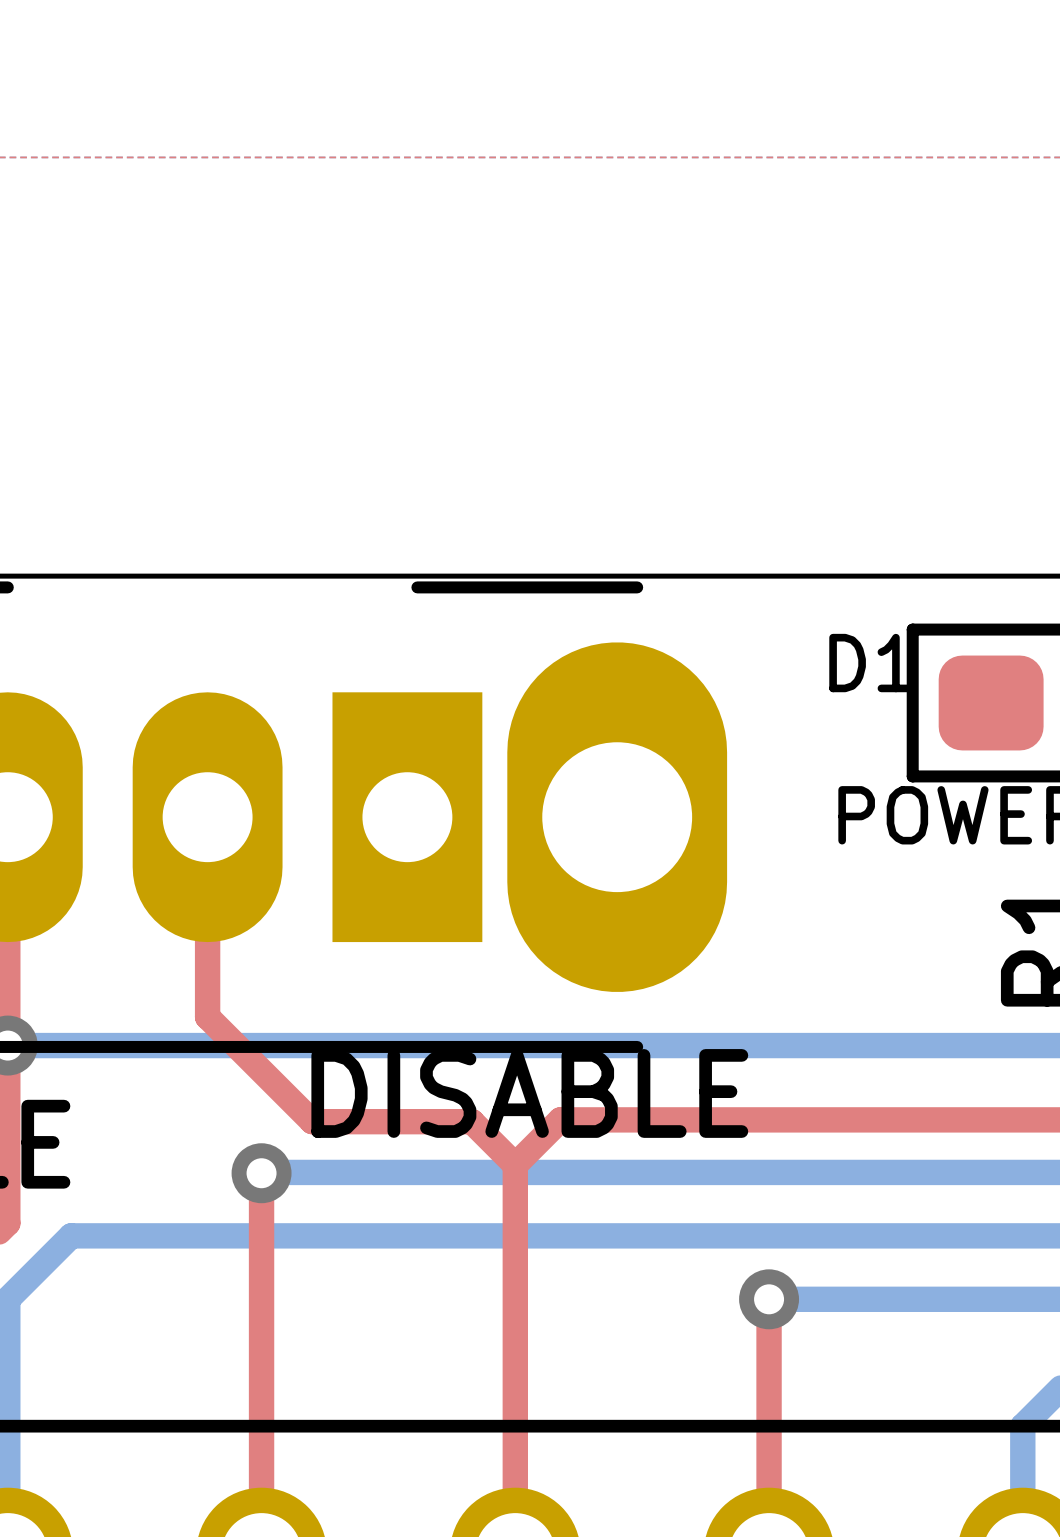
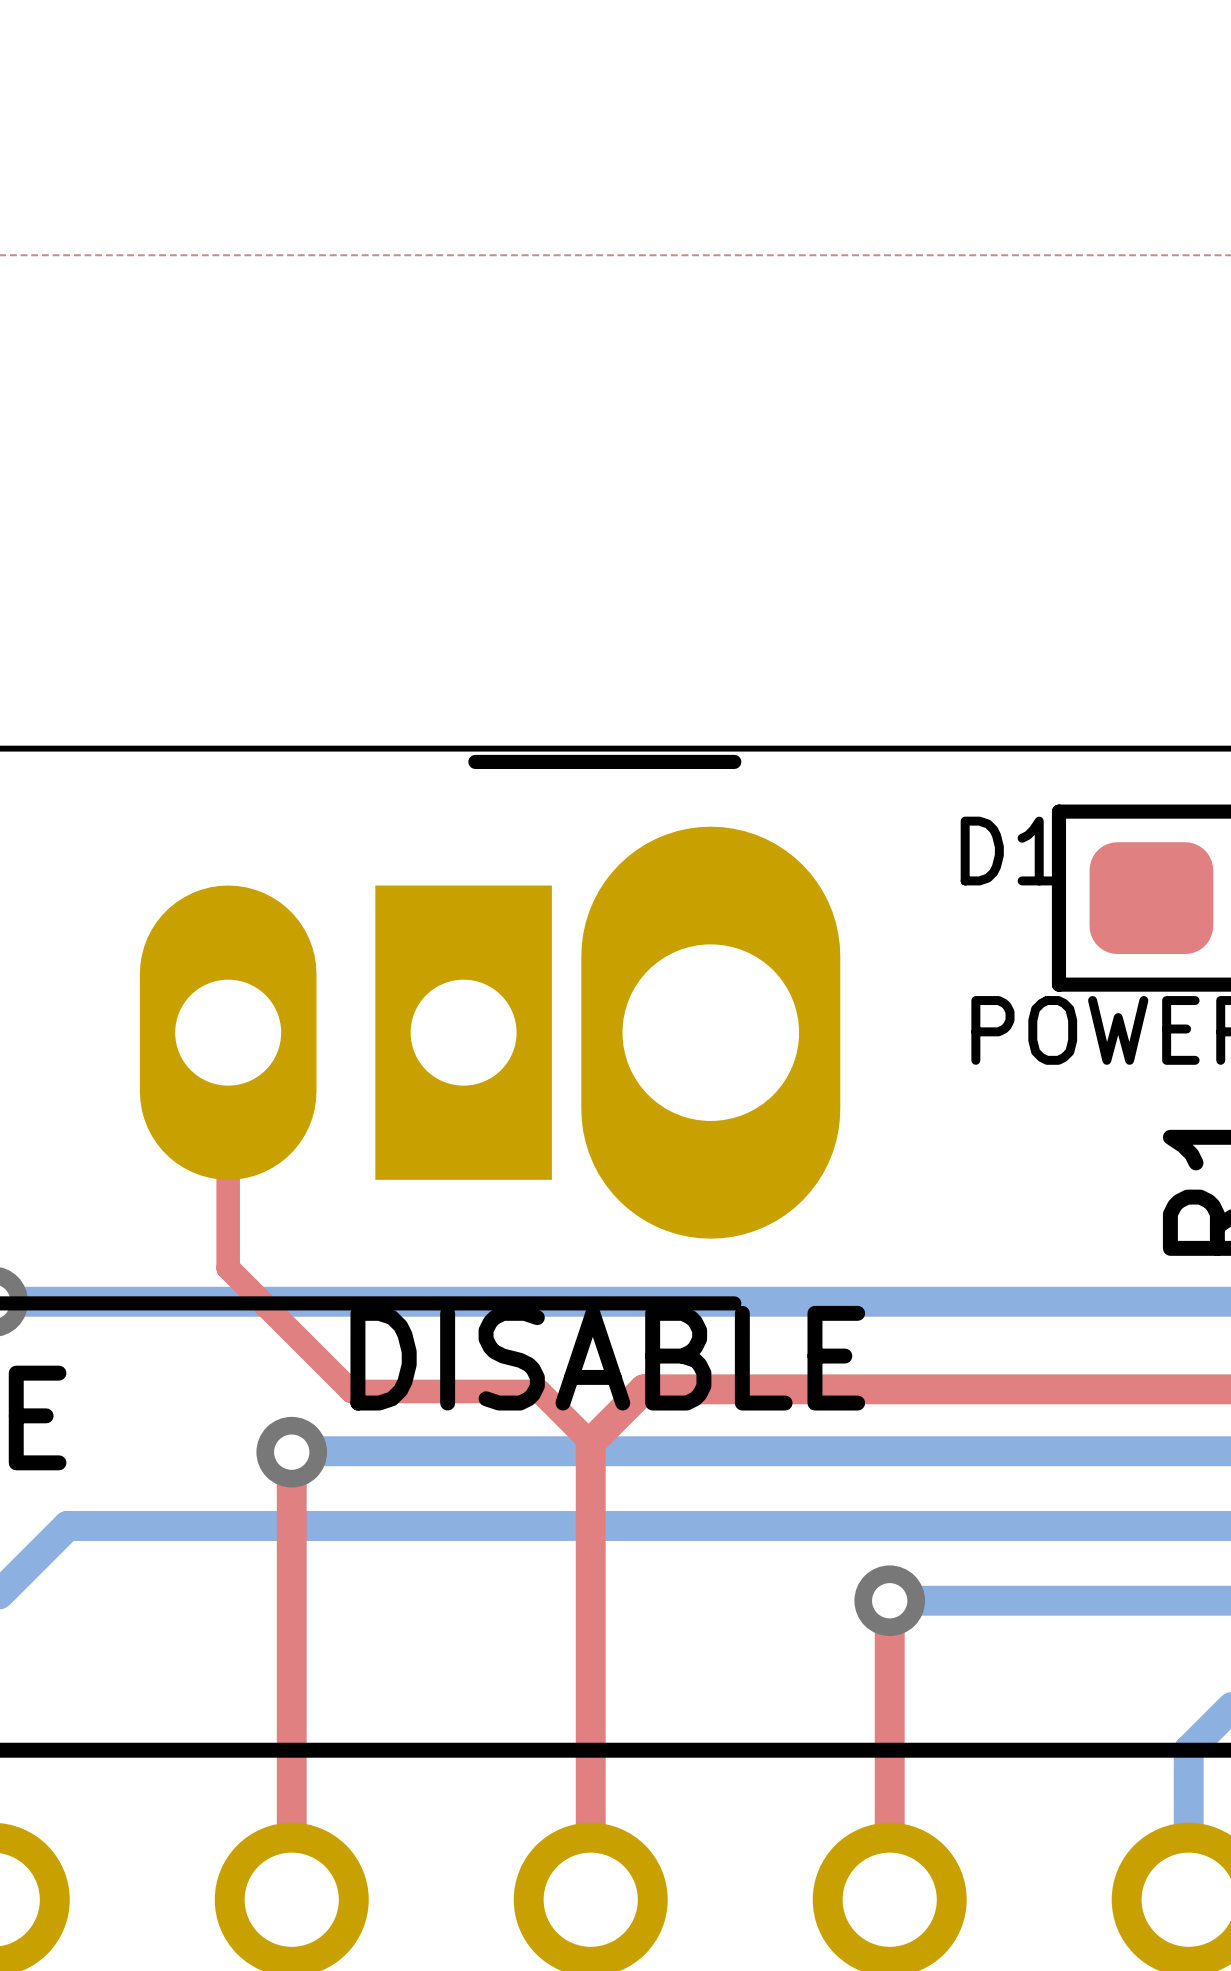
top track width: thick (207, 857) (207, 1016) (312, 1121) (471, 1121) (515, 1165) -> thin (228, 1079) (228, 1268) (351, 1391) (539, 1391) (590, 1442)

